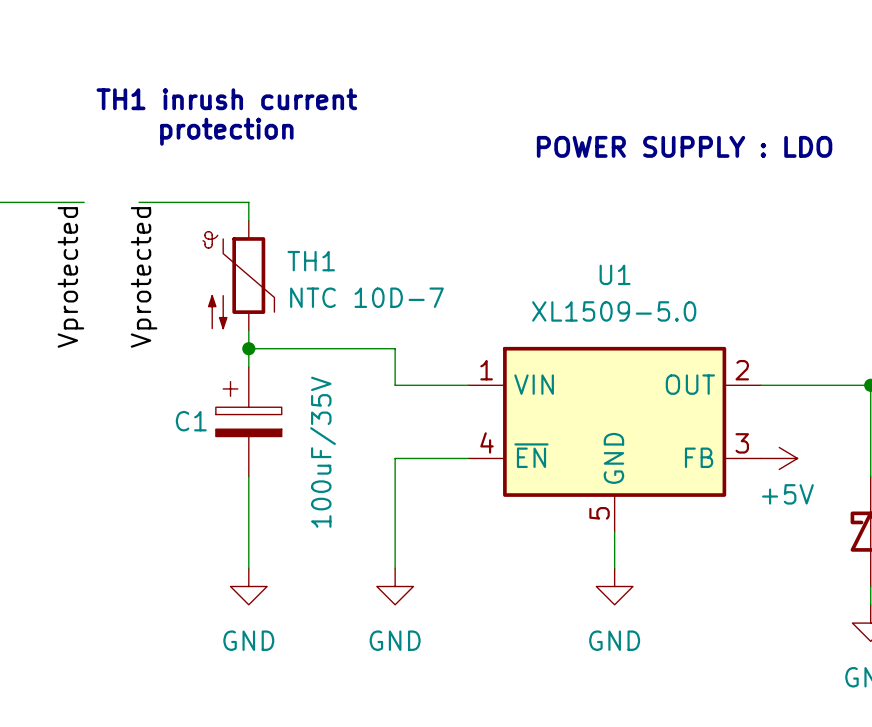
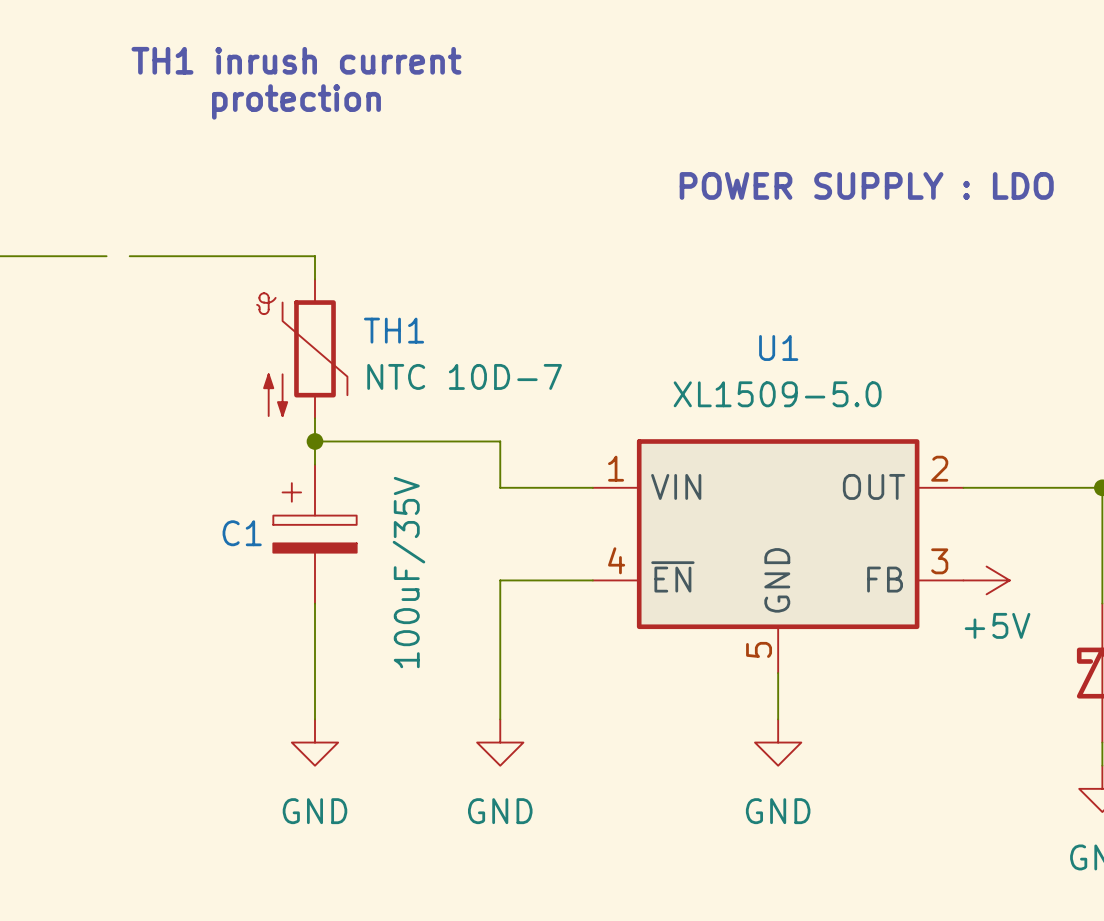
text position: TH1 inrush current (226, 99) -> TH1 inrush current (296, 60)
text position: protection (226, 131) -> protection (296, 101)
wire: none -> (129, 256) (176, 256)
label: Vprotected (70, 277) -> none
label: Vprotected (144, 277) -> none

